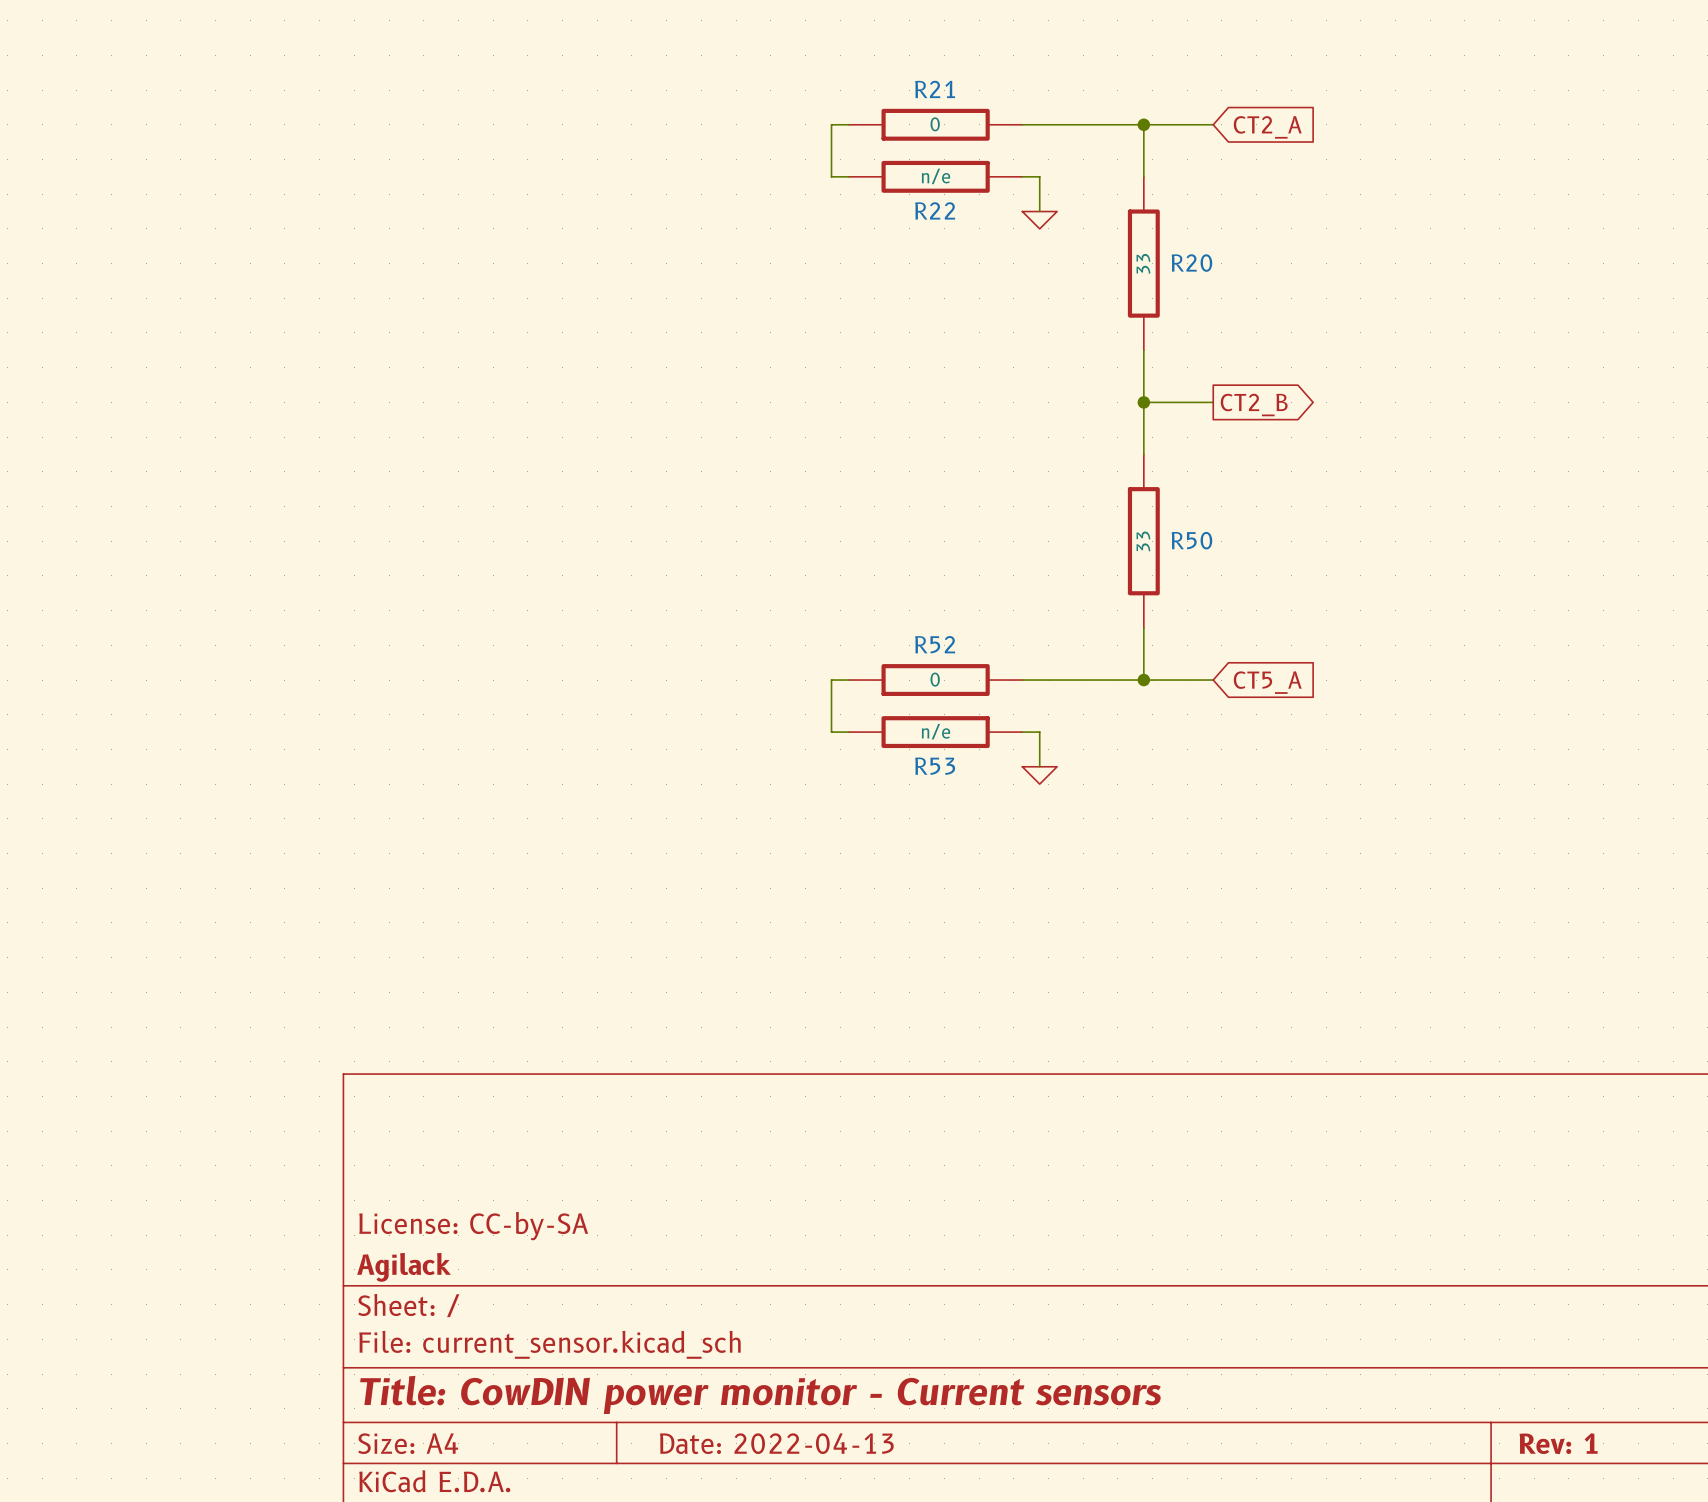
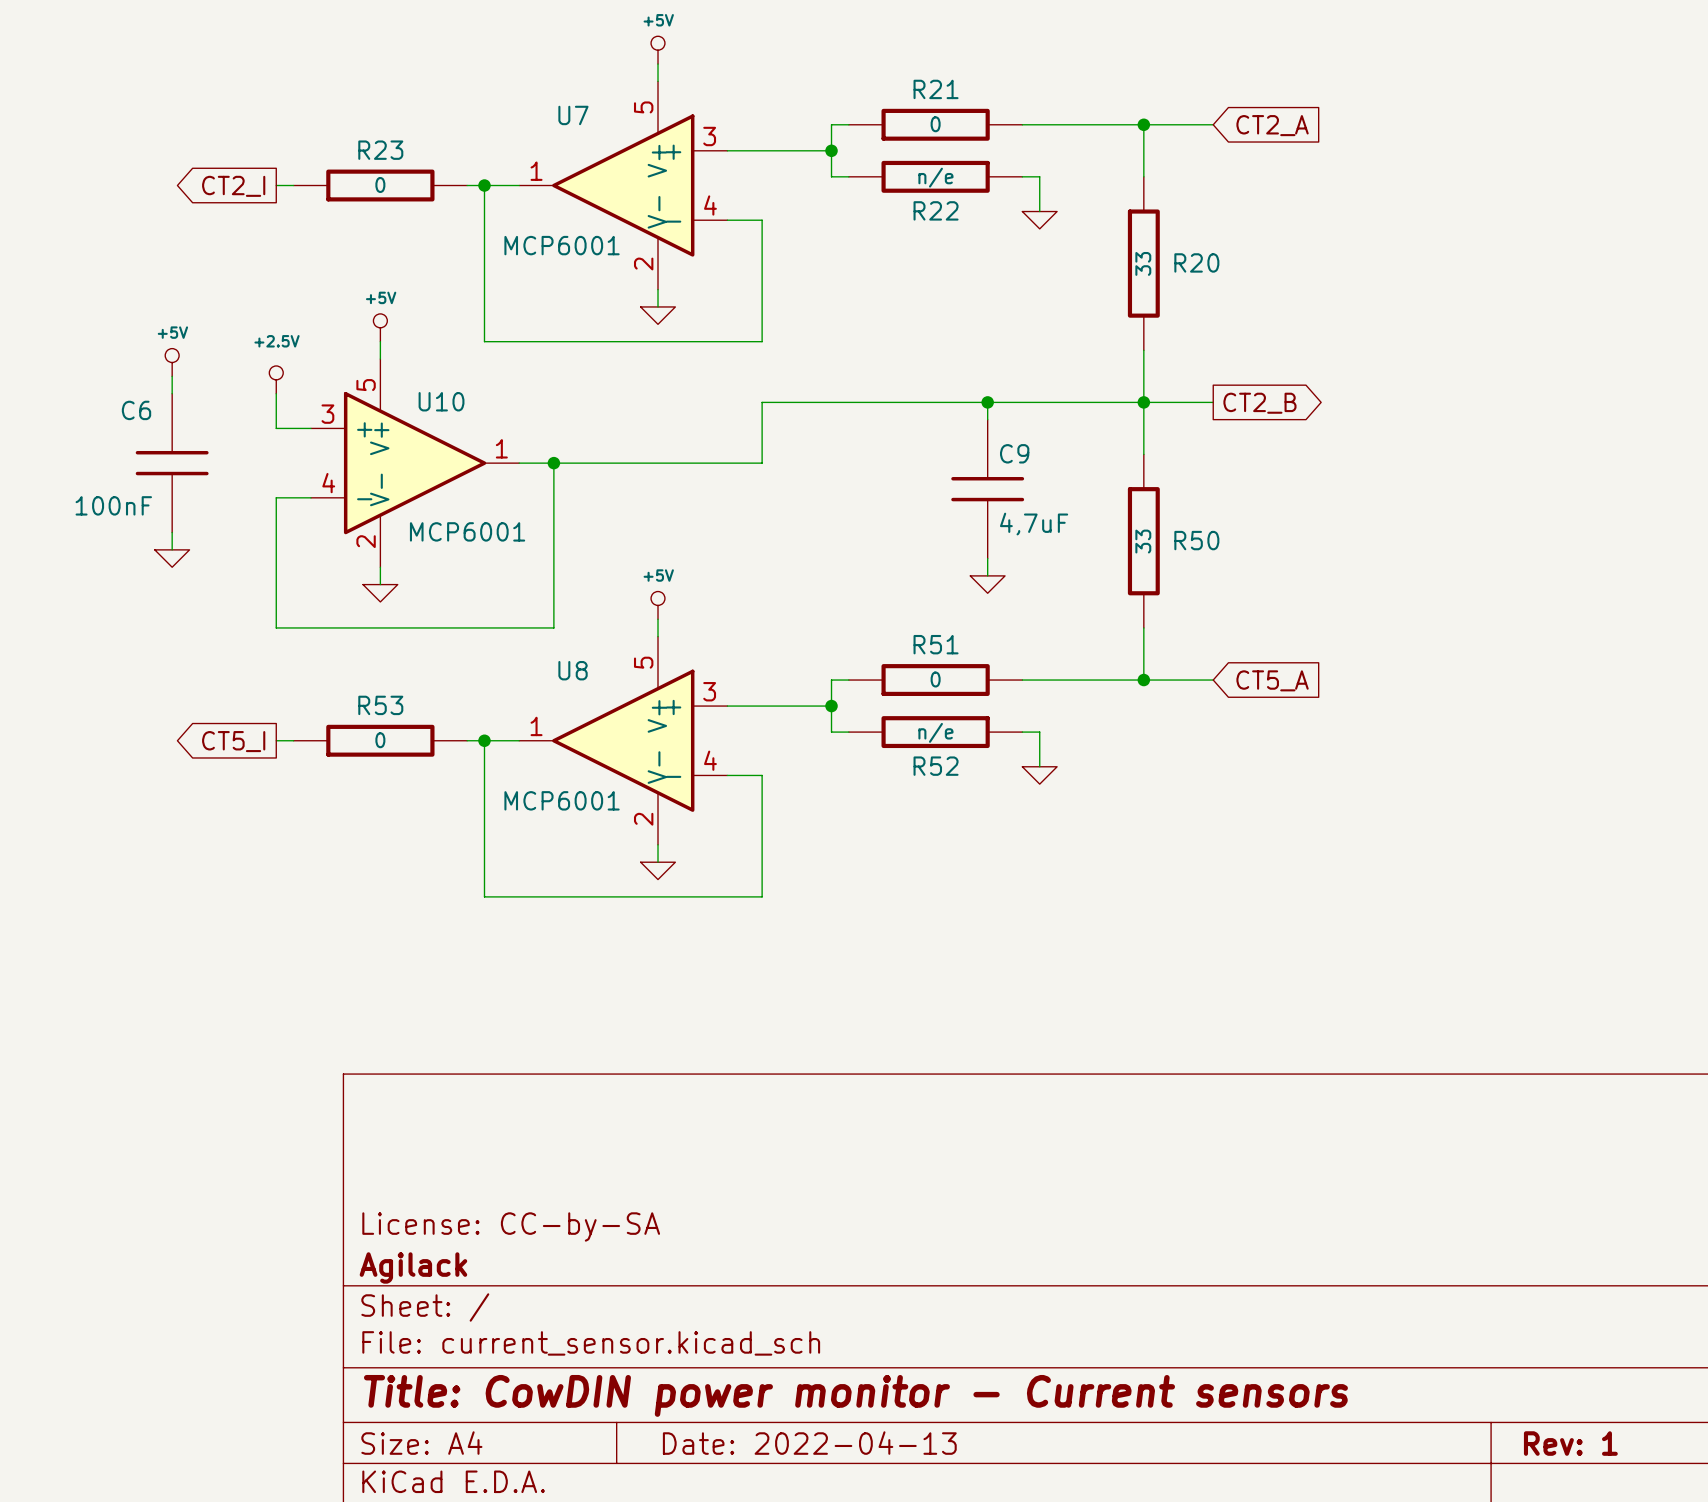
power symbol: none -> +5V (658, 50)
wire: none -> (658, 64) (658, 81)
wire: none -> (727, 150) (831, 150)
junction: none -> (831, 150)
wire: none -> (276, 185) (293, 185)
R23: none -> 0 (380, 185)
wire: none -> (467, 185) (519, 185)
wire: none -> (484, 185) (484, 341) (762, 341) (762, 220) (727, 220)
junction: none -> (484, 185)
U7: none -> MCP6001 (623, 185)
global label: none -> CT2_I (233, 186)
wire: none -> (658, 289) (658, 306)
power symbol: none -> (658, 315)
power symbol: none -> +5V (380, 327)
wire: none -> (380, 341) (380, 359)
power symbol: none -> +5V (172, 362)
wire: none -> (172, 376) (172, 393)
power symbol: none -> +2.5V (276, 379)
wire: none -> (276, 393) (276, 428) (310, 428)
wire: none -> (987, 402) (987, 419)
junction: none -> (987, 402)
wire: none -> (1143, 402) (762, 402) (762, 463) (519, 463)
C6: none -> 100nF (172, 463)
U10: none -> MCP6001 (415, 463)
wire: none -> (553, 463) (553, 627) (276, 627) (276, 497) (310, 497)
junction: none -> (553, 463)
C9: none -> 4,7uF (987, 489)
wire: none -> (172, 532) (172, 549)
power symbol: none -> (172, 558)
wire: none -> (987, 558) (987, 575)
wire: none -> (380, 567) (380, 584)
power symbol: none -> (987, 584)
power symbol: none -> (380, 593)
power symbol: none -> +5V (658, 605)
wire: none -> (658, 619) (658, 636)
R52 name: R52 (935, 644) -> R51 (936, 644)
wire: none -> (727, 706) (831, 706)
junction: none -> (831, 706)
wire: none -> (276, 740) (293, 740)
R53: none -> 0 (380, 740)
wire: none -> (467, 740) (519, 740)
wire: none -> (484, 740) (484, 896) (762, 896) (762, 775) (727, 775)
junction: none -> (484, 740)
U8: none -> MCP6001 (623, 740)
global label: none -> CT5_I (233, 741)
R53 name: R53 (935, 766) -> R52 (936, 766)
wire: none -> (658, 844) (658, 862)
power symbol: none -> (658, 870)

